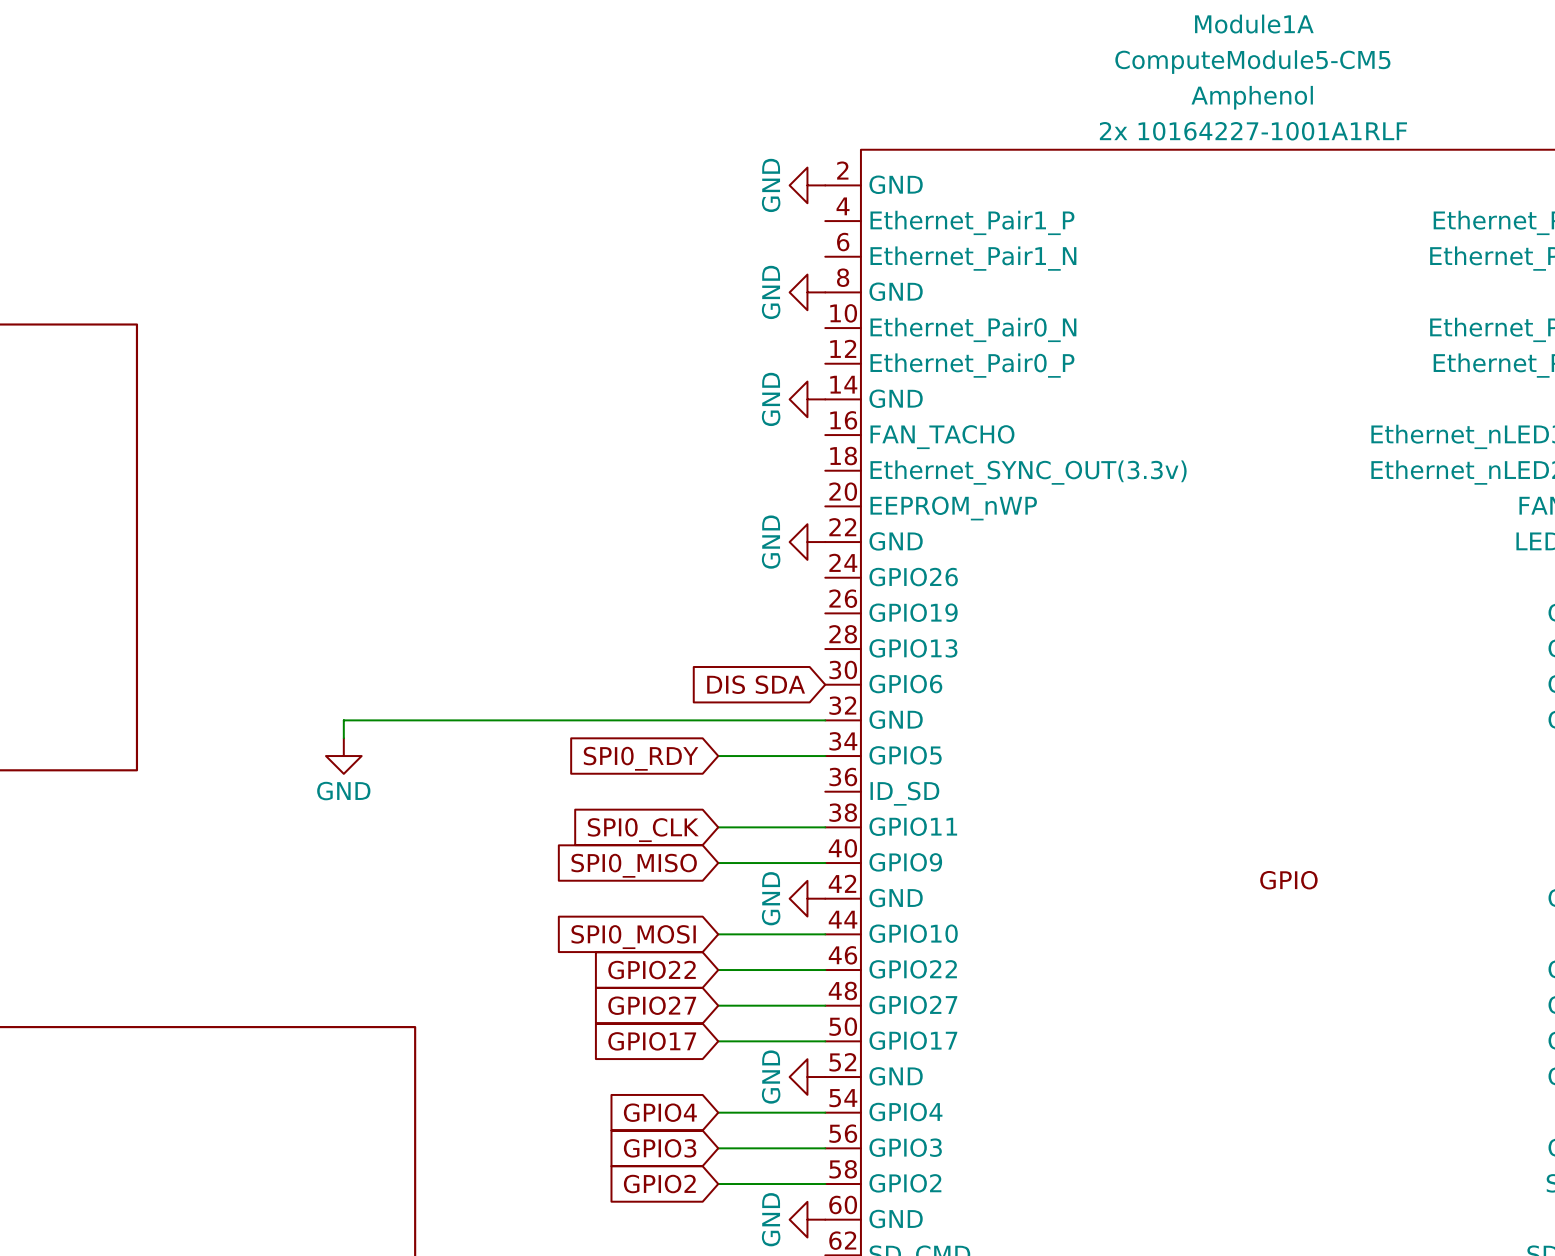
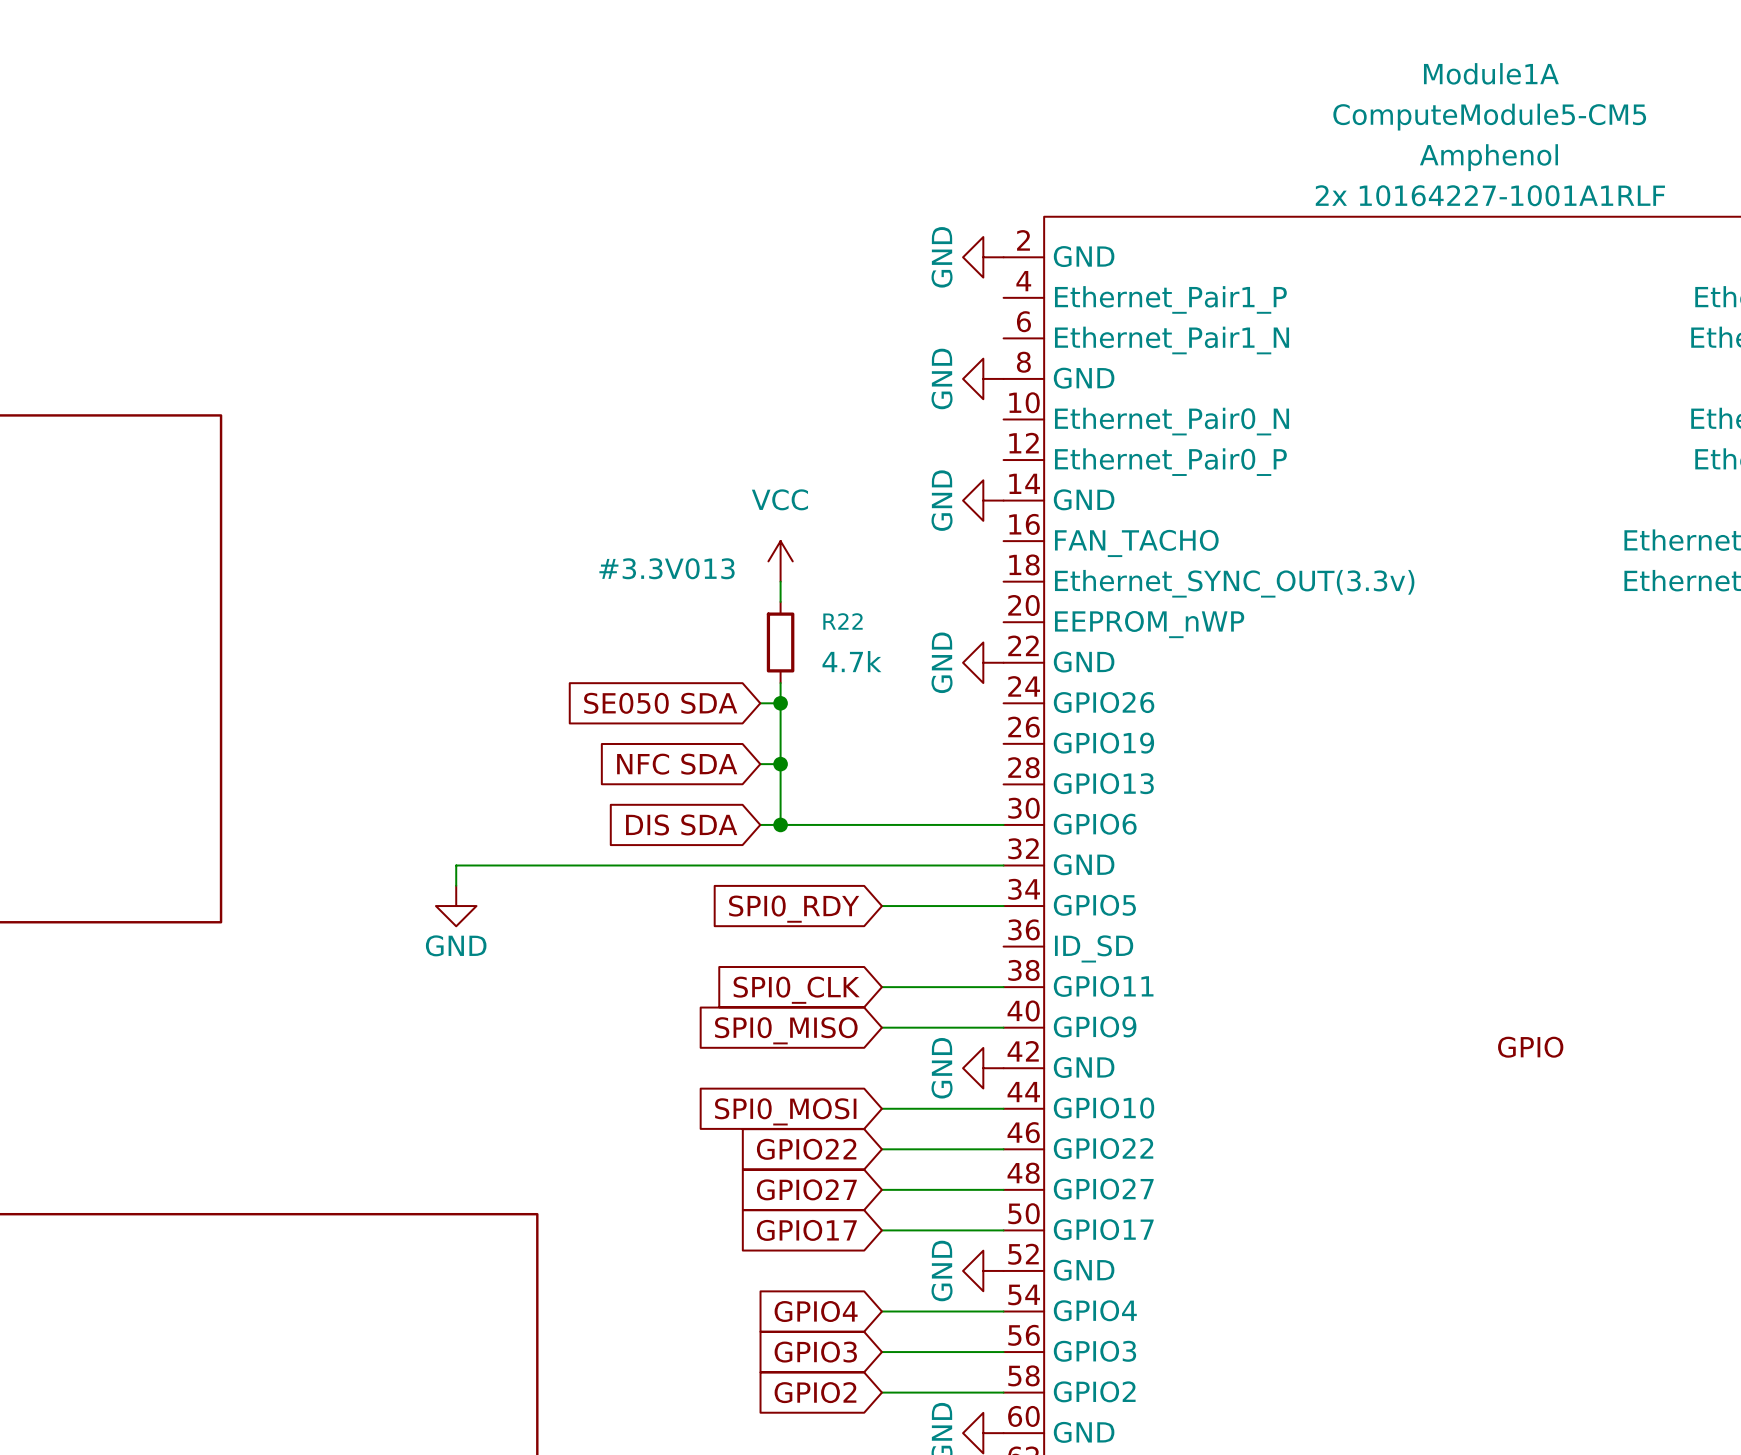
#3.3V013: none -> VCC (780, 561)
wire: none -> (780, 581) (780, 601)
R22: none -> 4.7k (780, 642)
wire: none -> (780, 683) (780, 824)
global label: none -> SE050 SDA (660, 703)
wire: none -> (760, 703) (780, 703)
junction: none -> (780, 703)
global label: none -> NFC SDA (677, 764)
wire: none -> (760, 764) (780, 764)
junction: none -> (780, 764)
wire: none -> (760, 824) (1003, 824)
junction: none -> (780, 824)
global label position: DIS SDA (756, 684) -> DIS SDA (681, 824)

